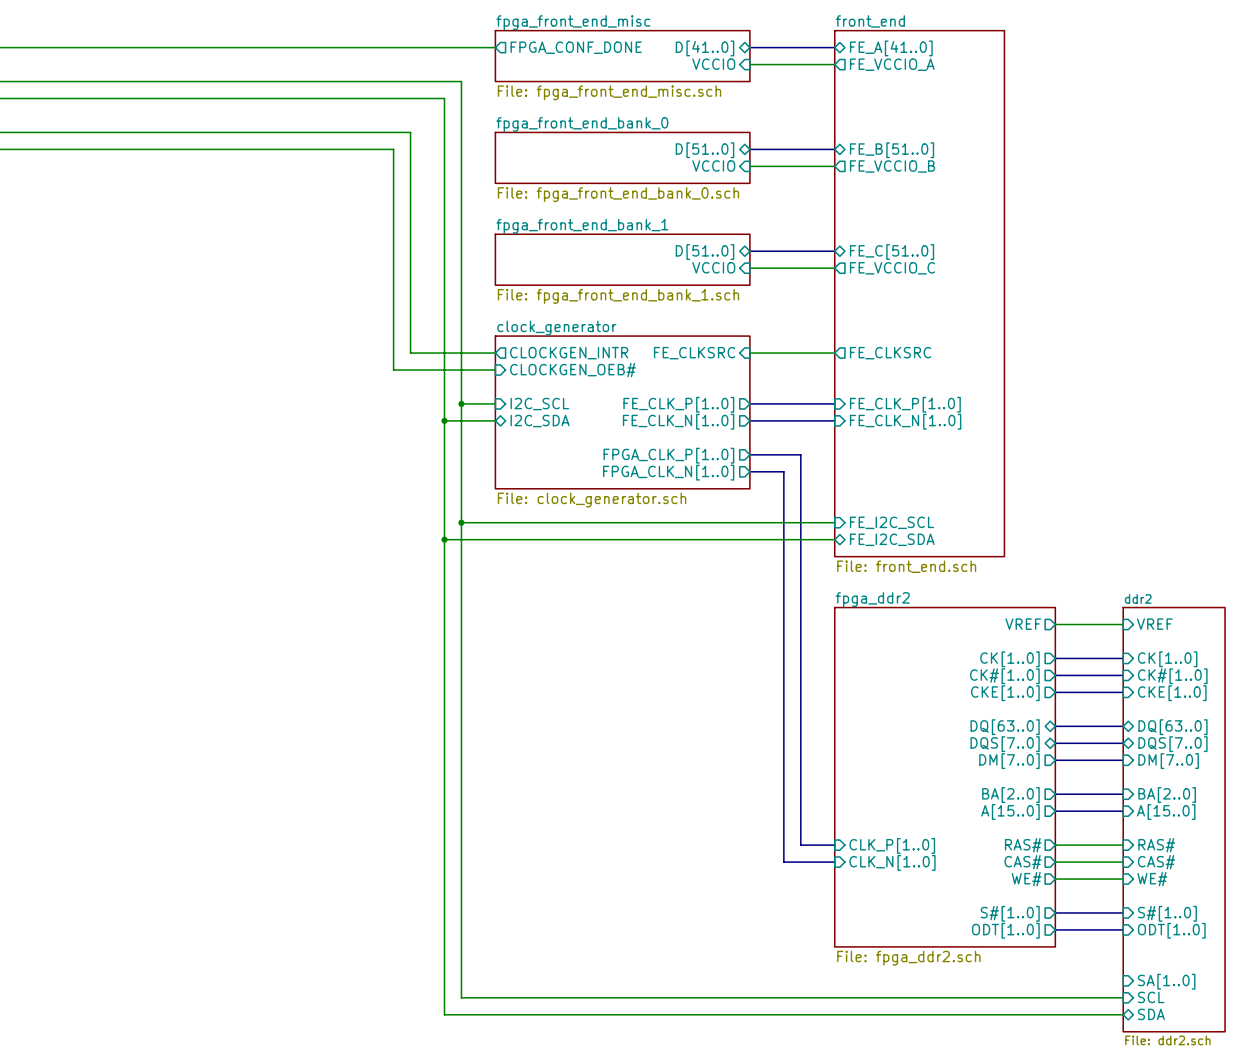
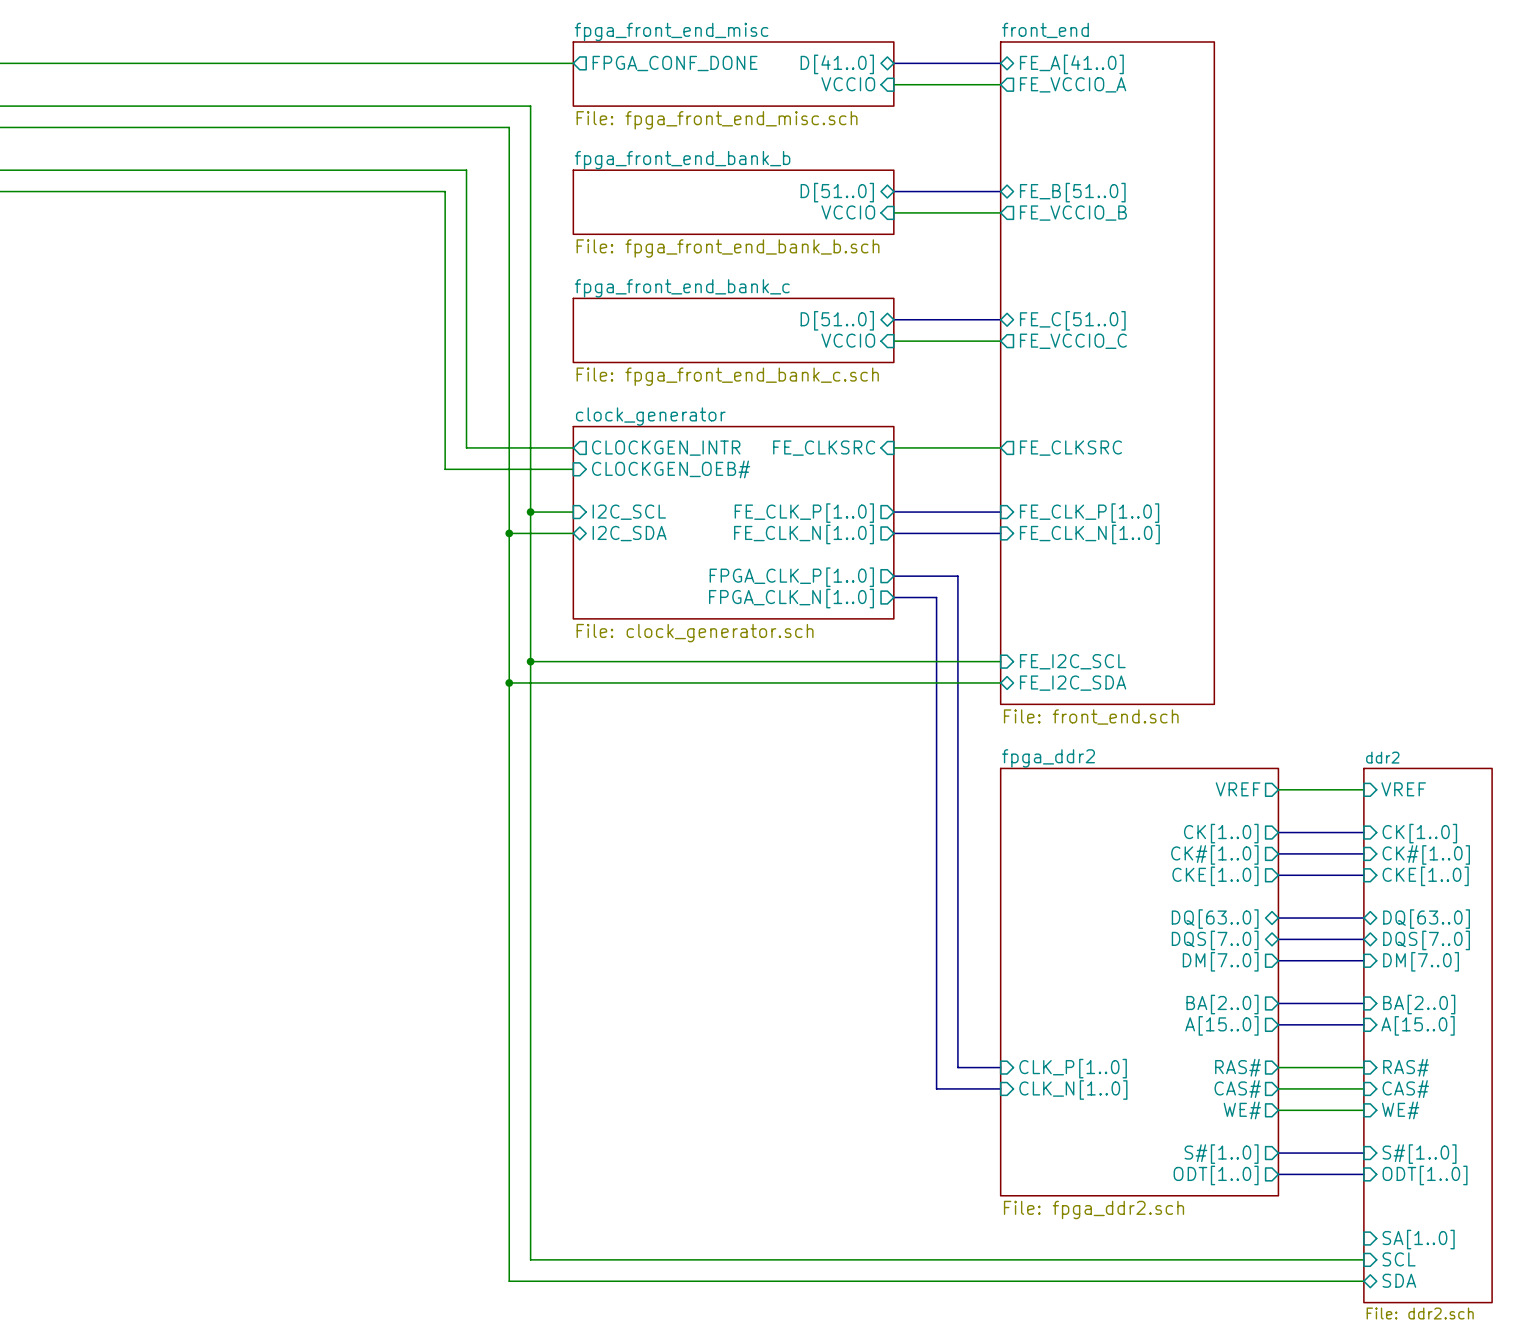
sheet fpga_front_end_bank_0 name: fpga_front_end_bank_0 (582, 124) -> fpga_front_end_bank_b (682, 160)
sheet fpga_front_end_bank_0 value: File: fpga_front_end_bank_0.sch (618, 194) -> File: fpga_front_end_bank_b.sch (728, 248)
sheet fpga_front_end_bank_1 name: fpga_front_end_bank_1 (582, 226) -> fpga_front_end_bank_c (682, 288)
sheet fpga_front_end_bank_1 value: File: fpga_front_end_bank_1.sch (618, 296) -> File: fpga_front_end_bank_c.sch (727, 376)

